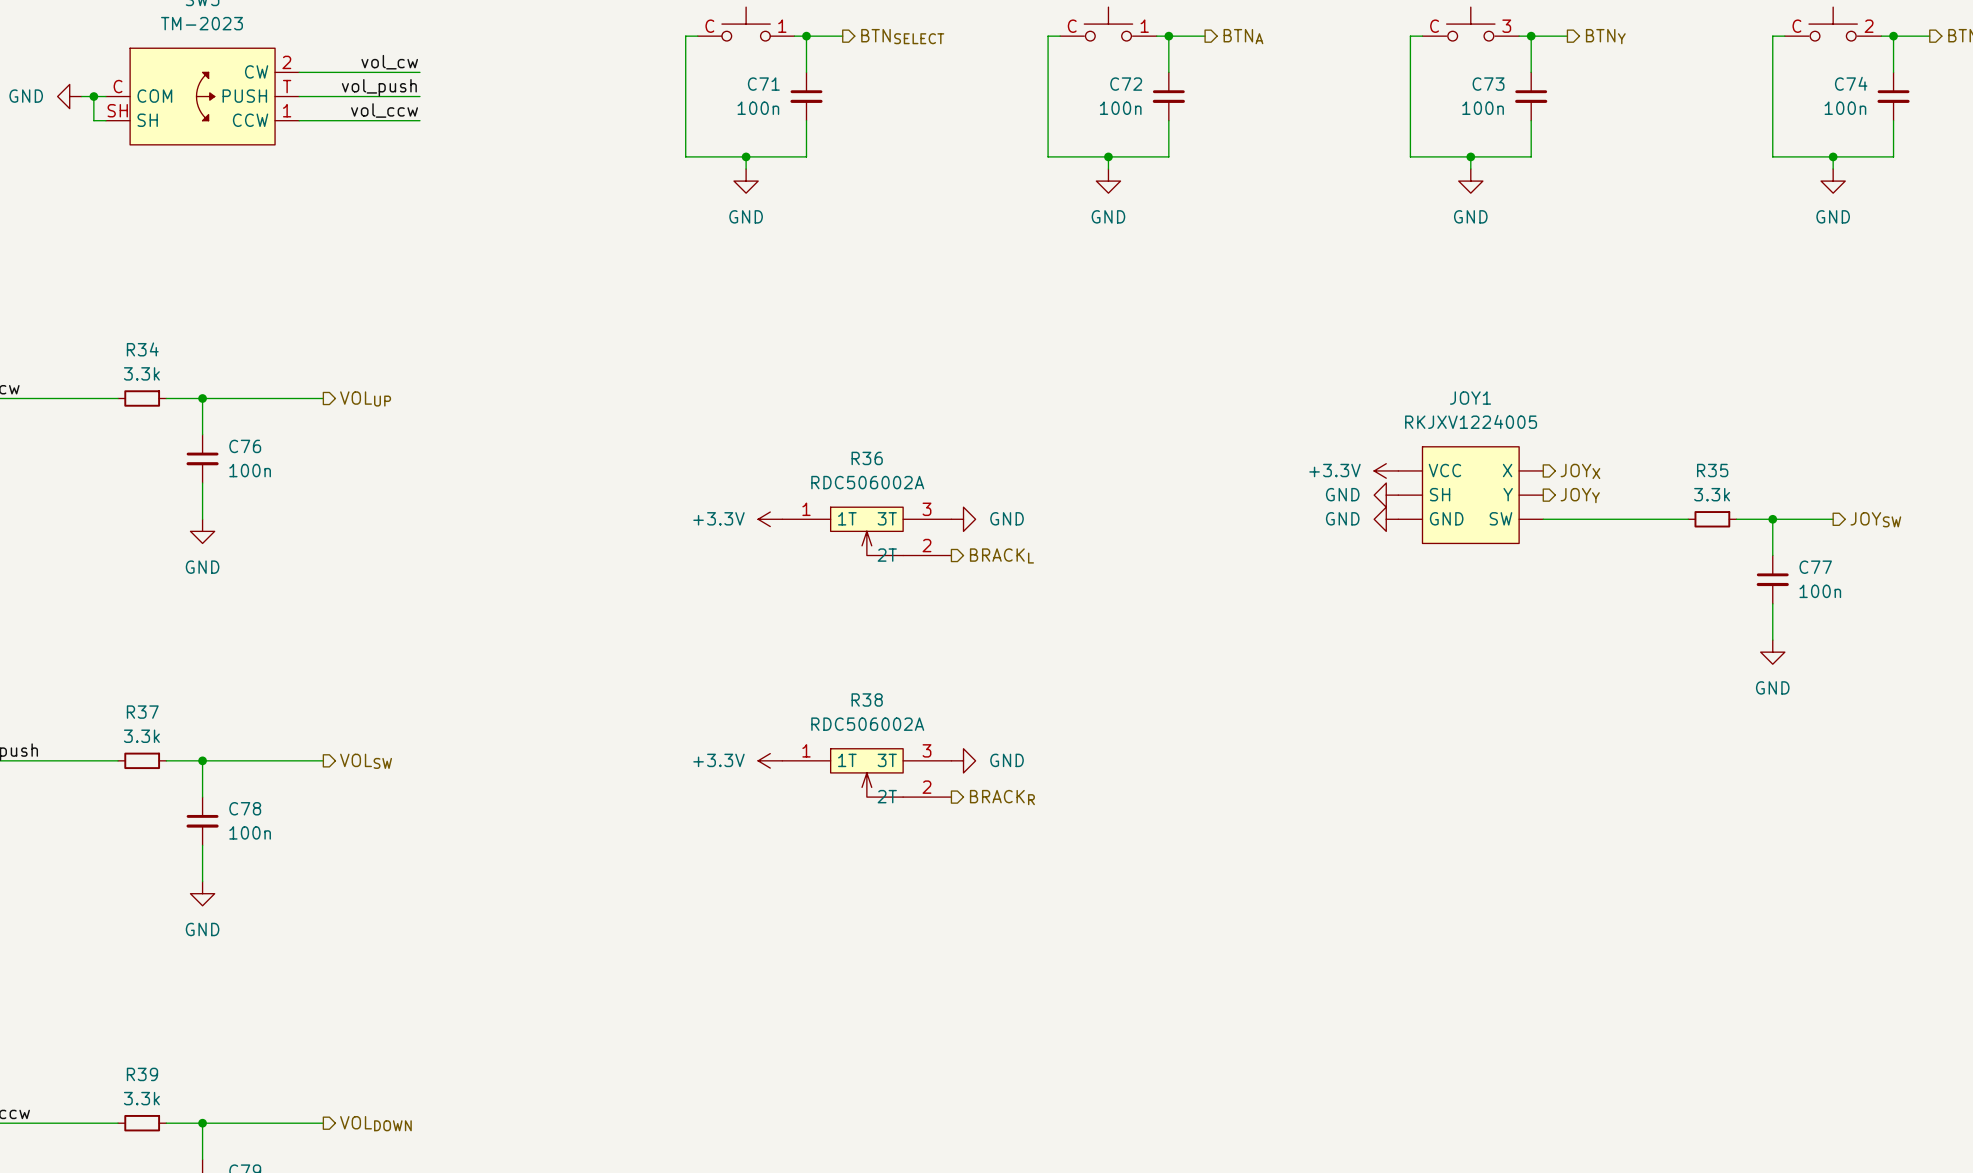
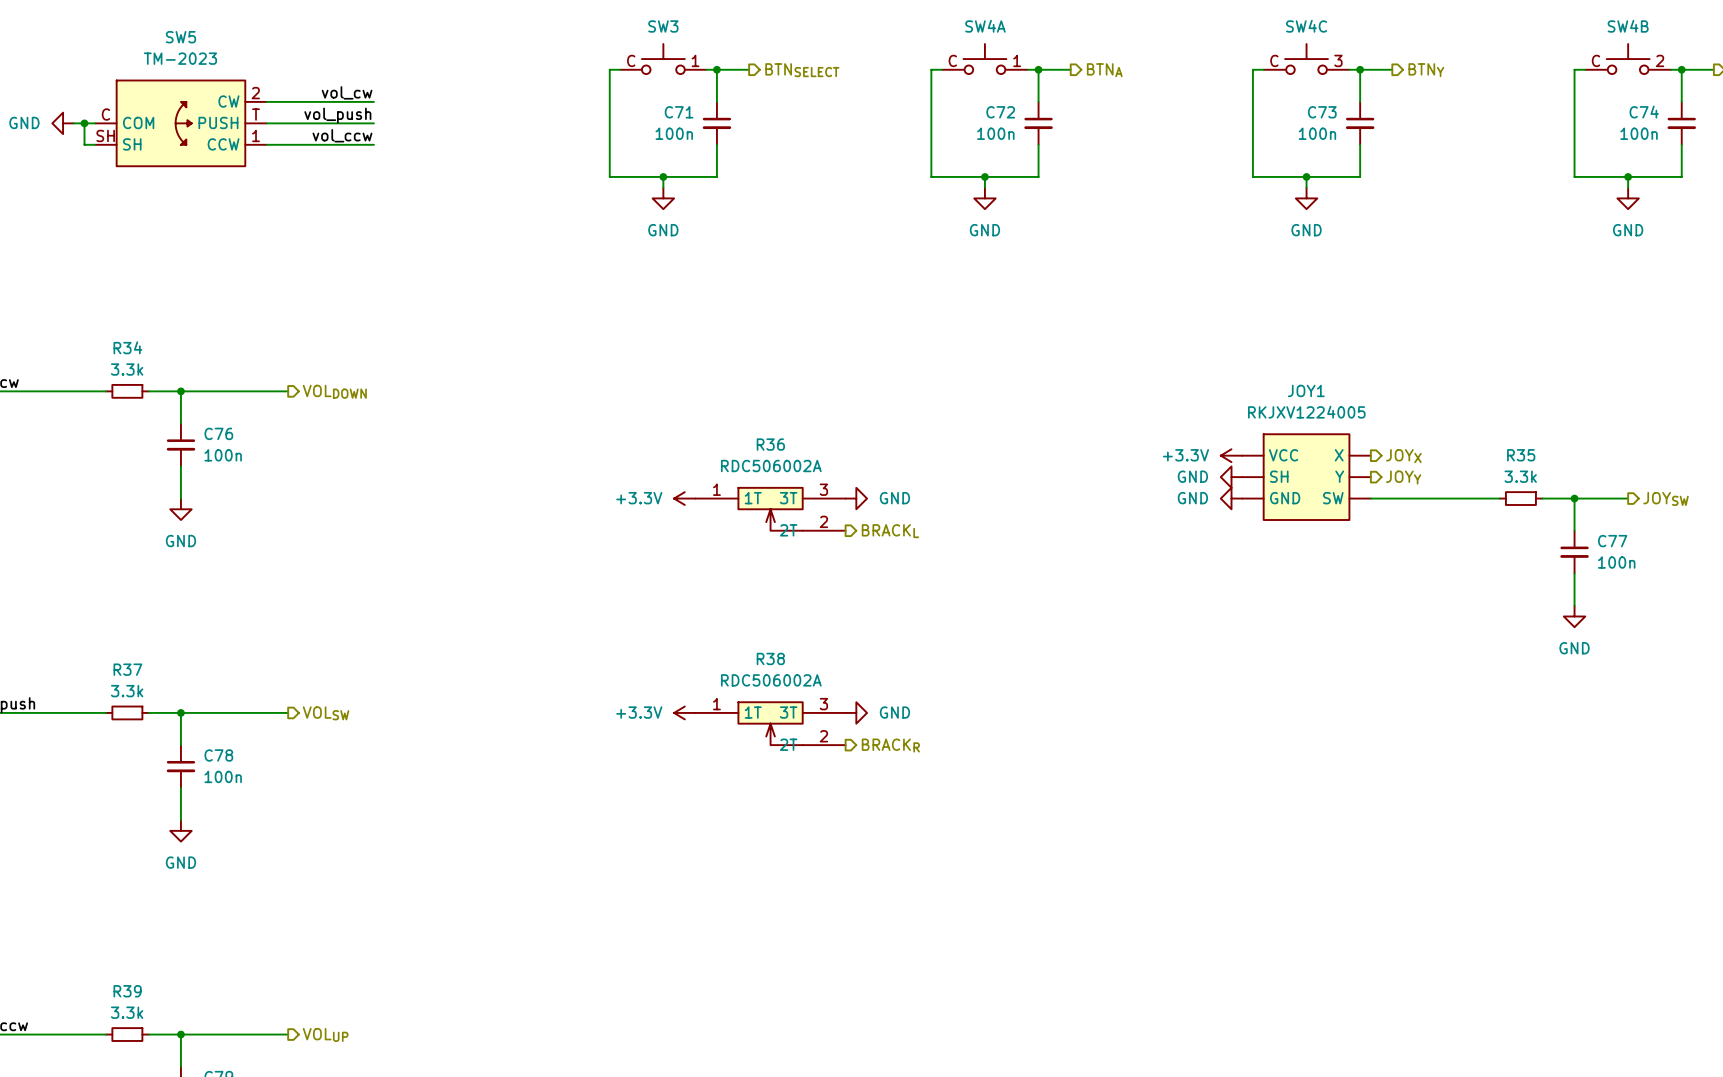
hierarchical label: VOLUP (365, 398) -> VOLDOWN (334, 391)
hierarchical label: VOLDOWN (375, 1123) -> VOLUP (325, 1034)

